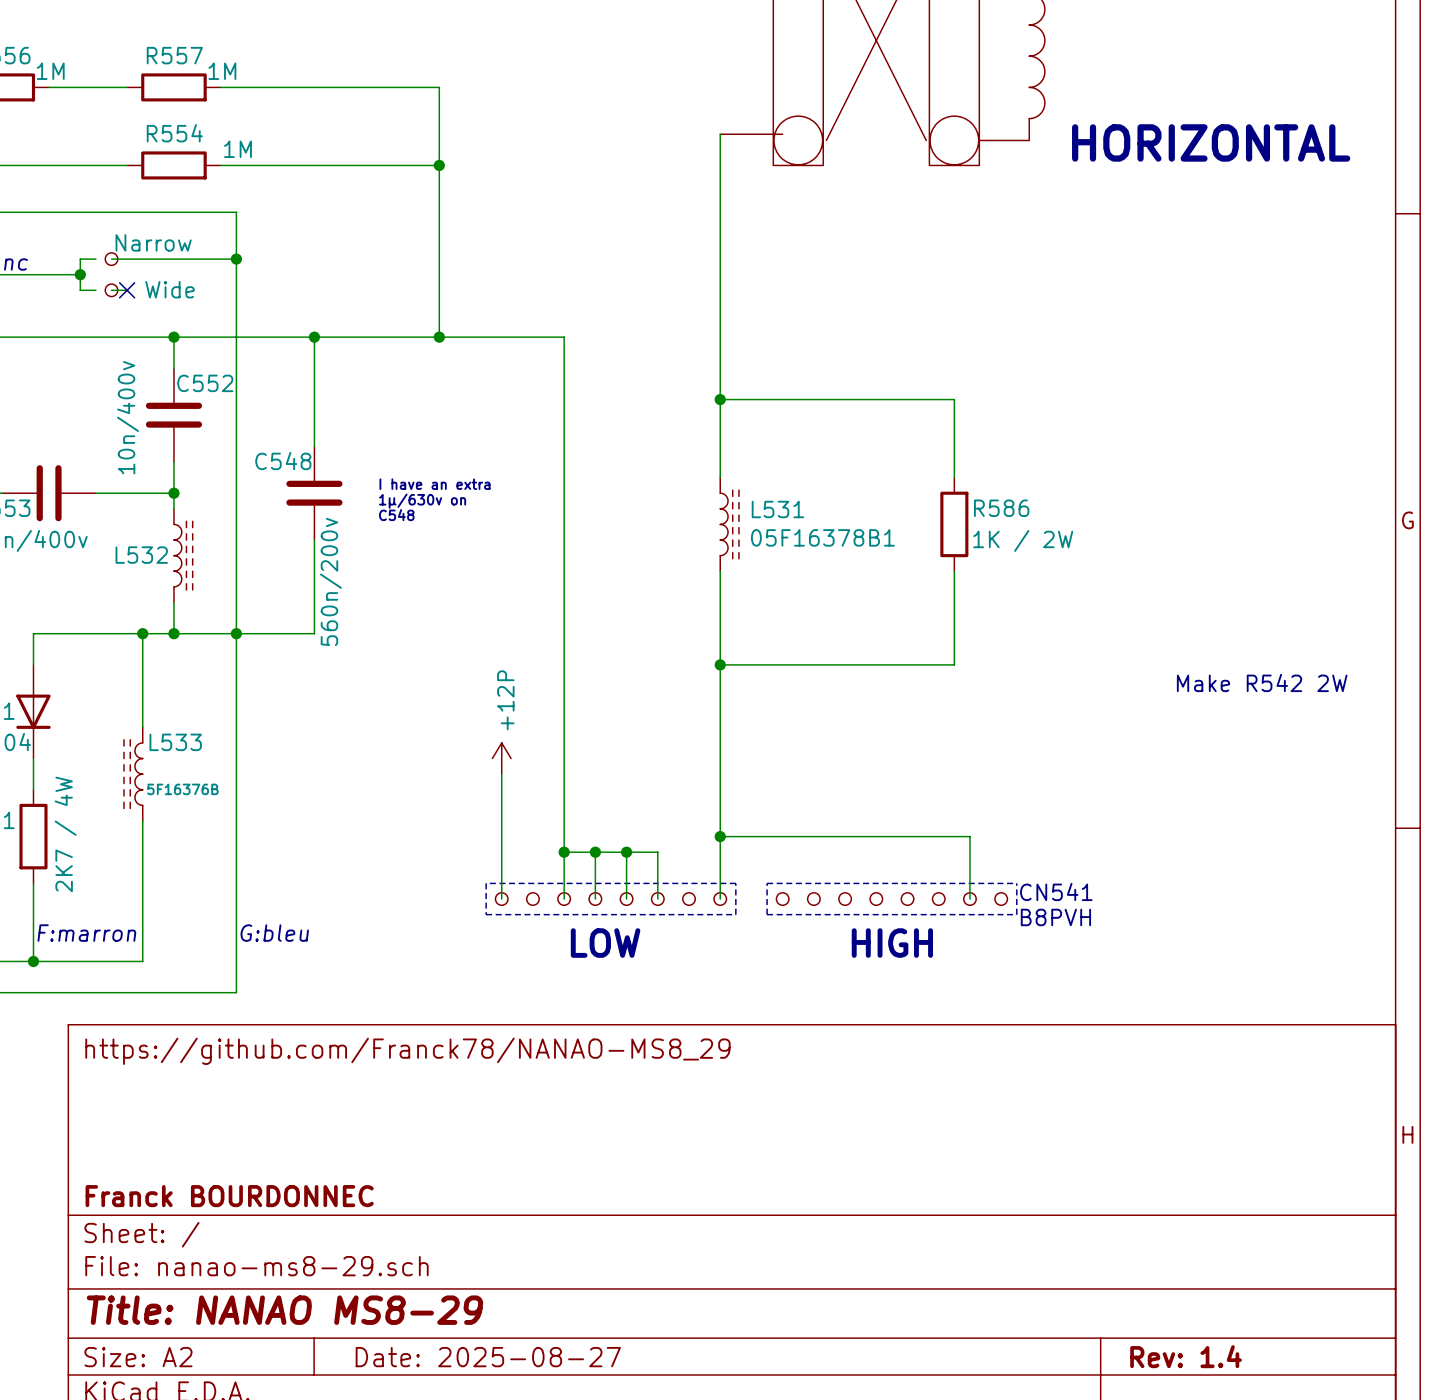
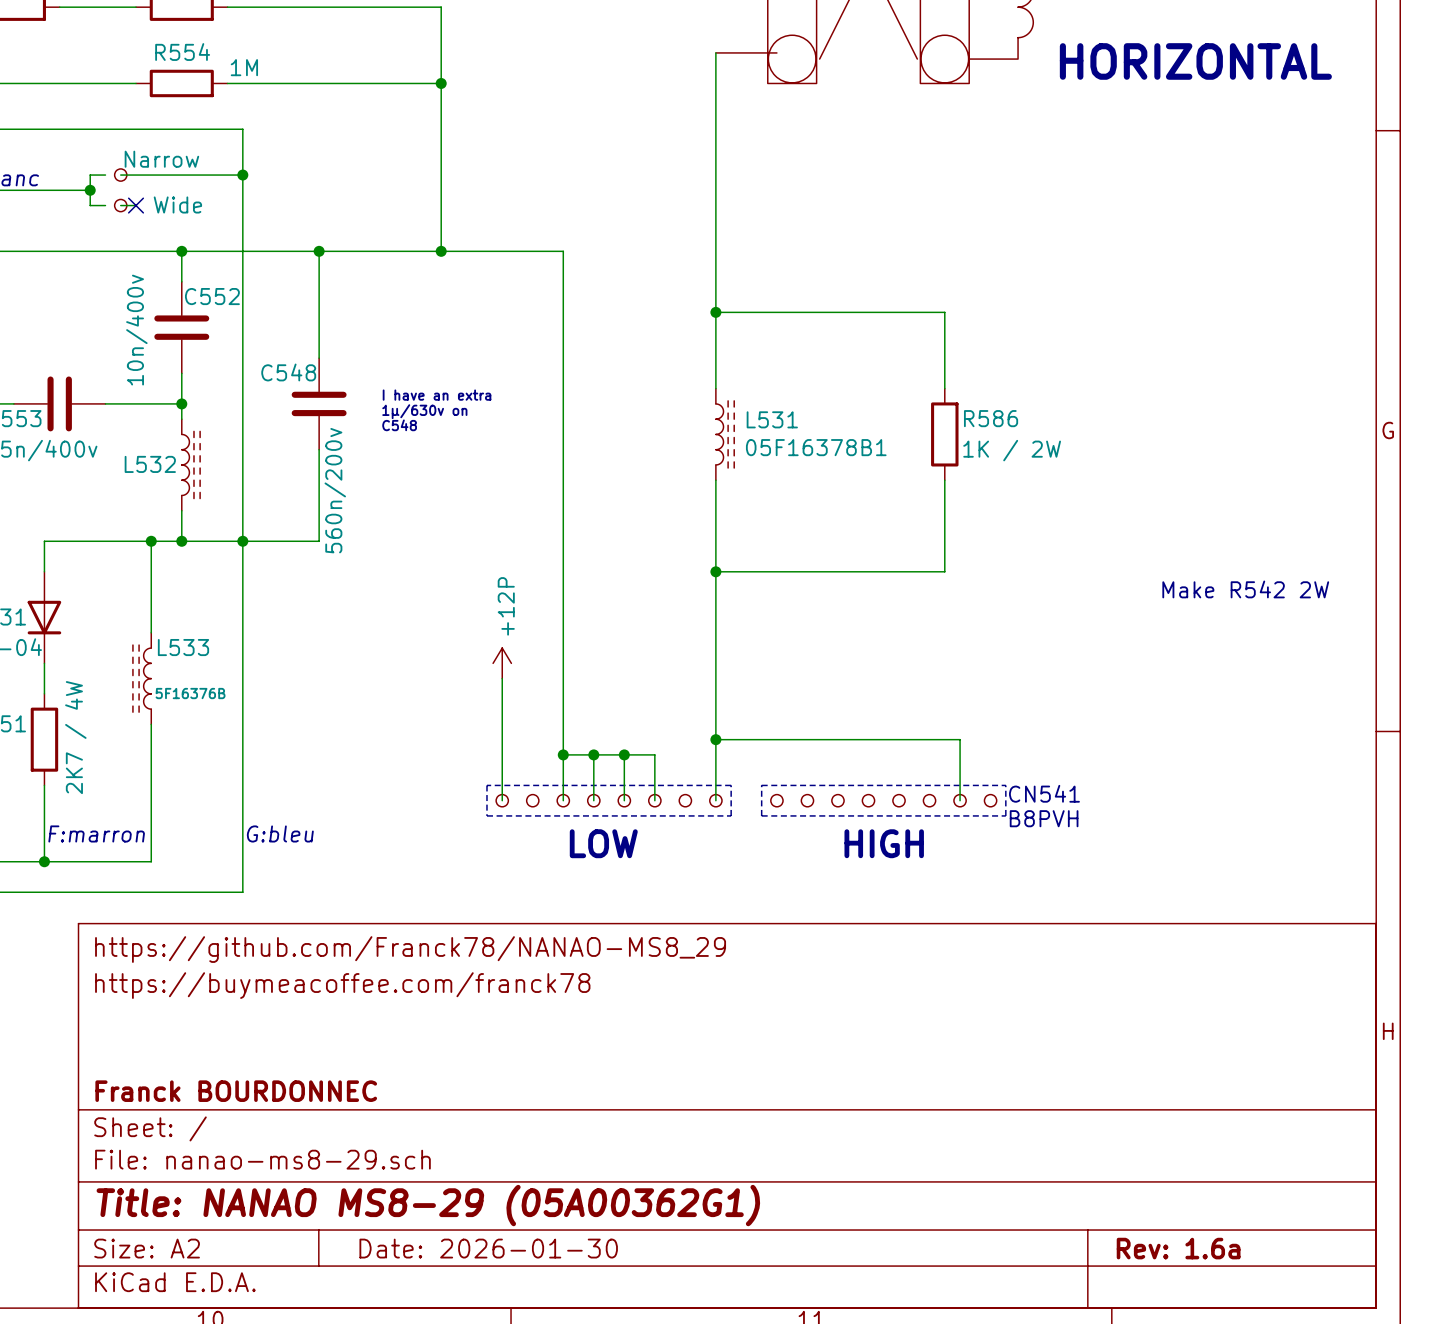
title block: none -> https://buymeacoffee.com/franck78 (342, 985)
title block: Title: NANAO MS8-29 (285, 1310) -> Title: NANAO MS8-29 (05A00362G1) (428, 1205)
title block: Rev: 1.4 (1186, 1356) -> Rev: 1.6a (1178, 1248)
title block: Date: 2025-08-27 (488, 1357) -> Date: 2026-01-30 (488, 1248)

